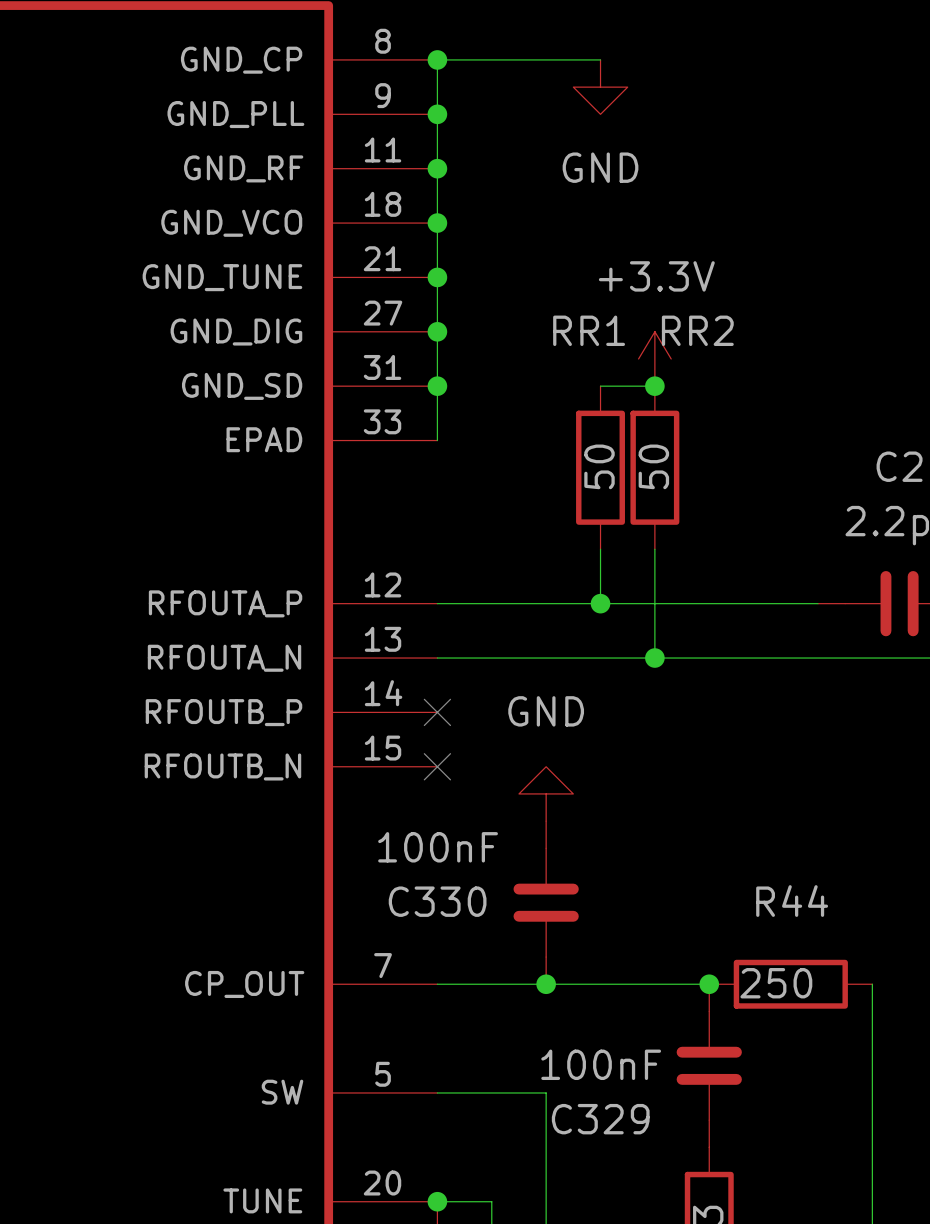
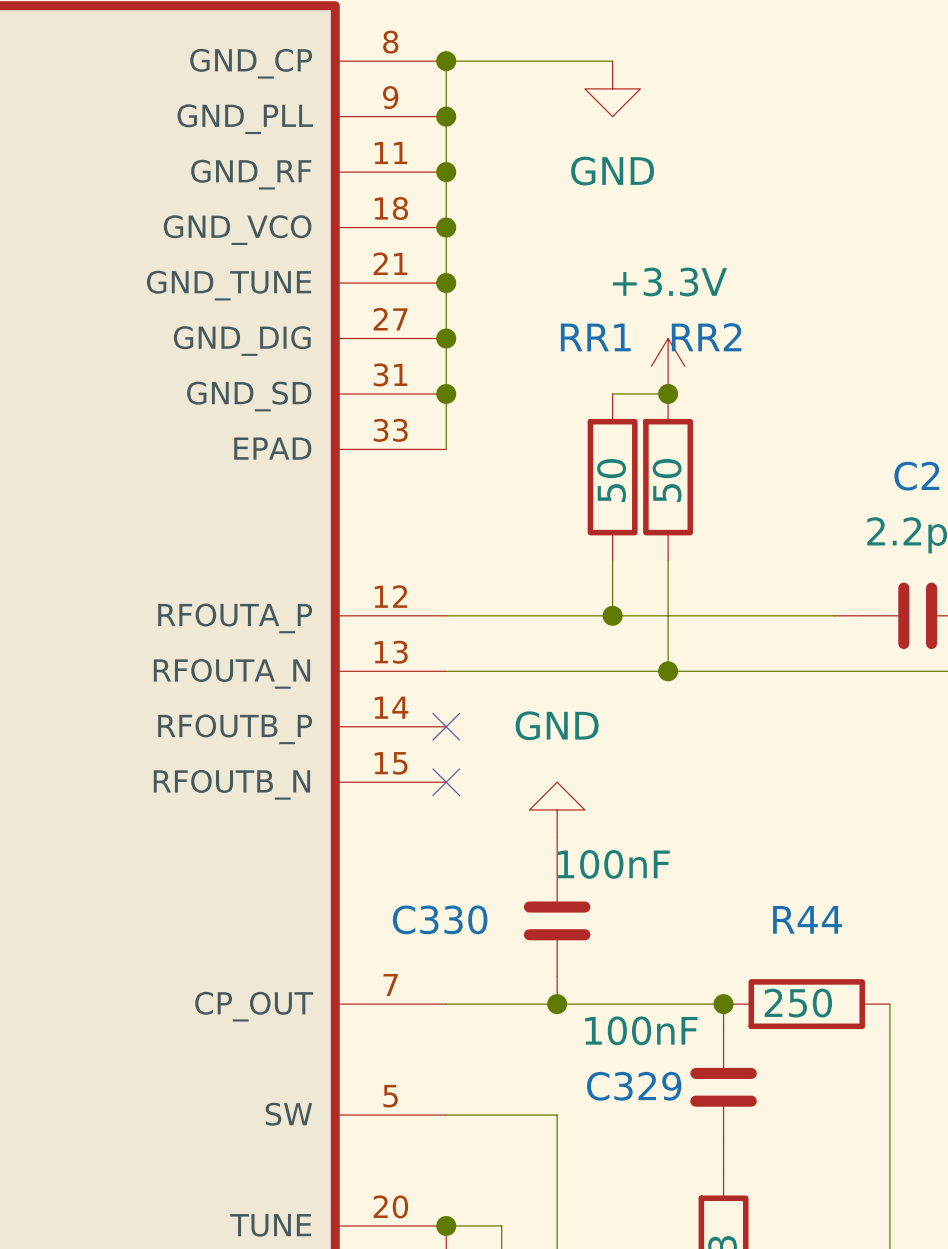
C330 value position: 100nF (438, 847) -> 100nF (613, 864)
C329 value position: 100nF (601, 1064) -> 100nF (641, 1030)
C329 name position: C329 (600, 1119) -> C329 (634, 1086)

